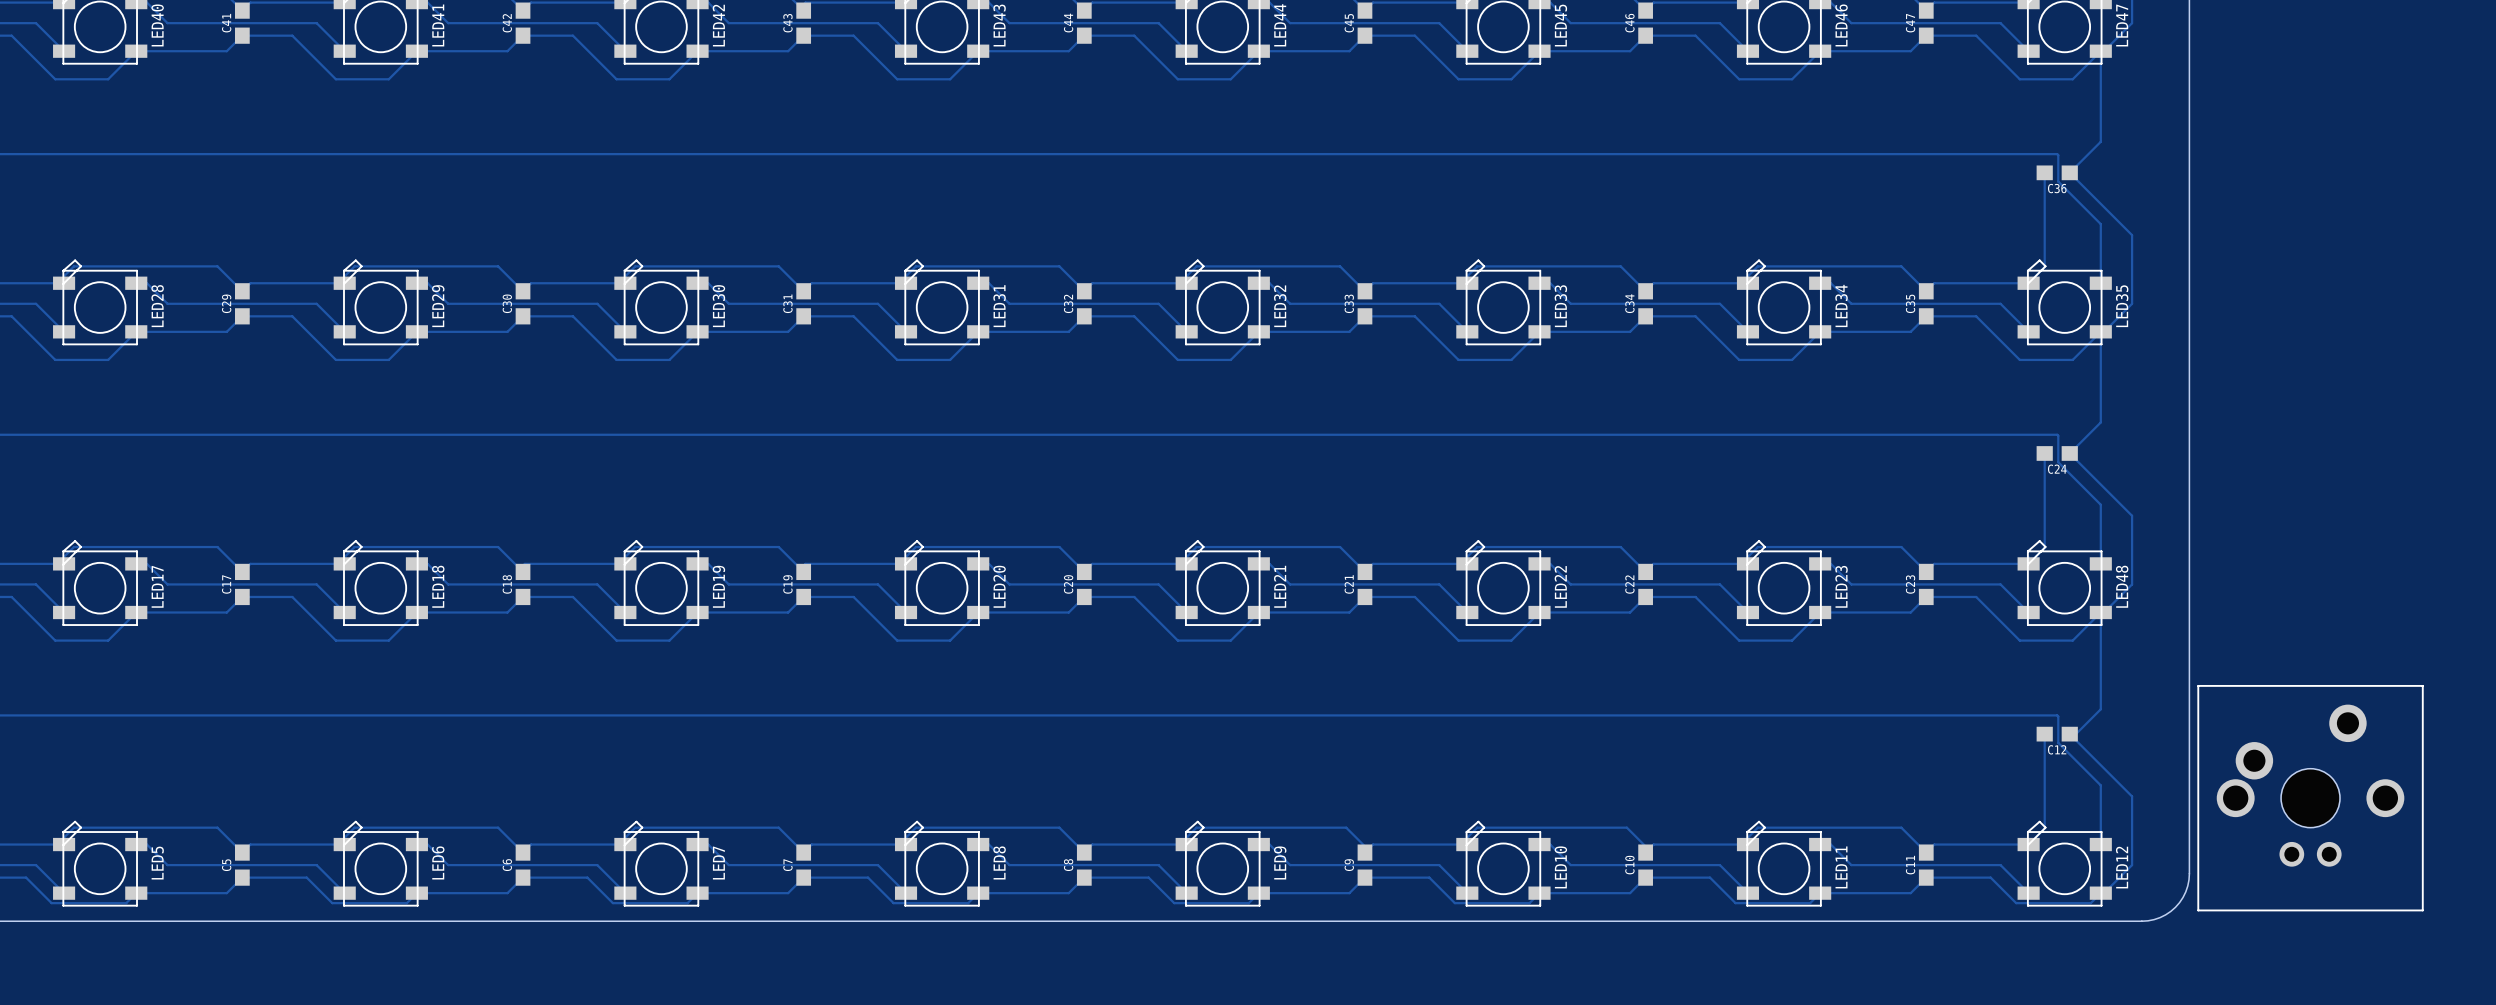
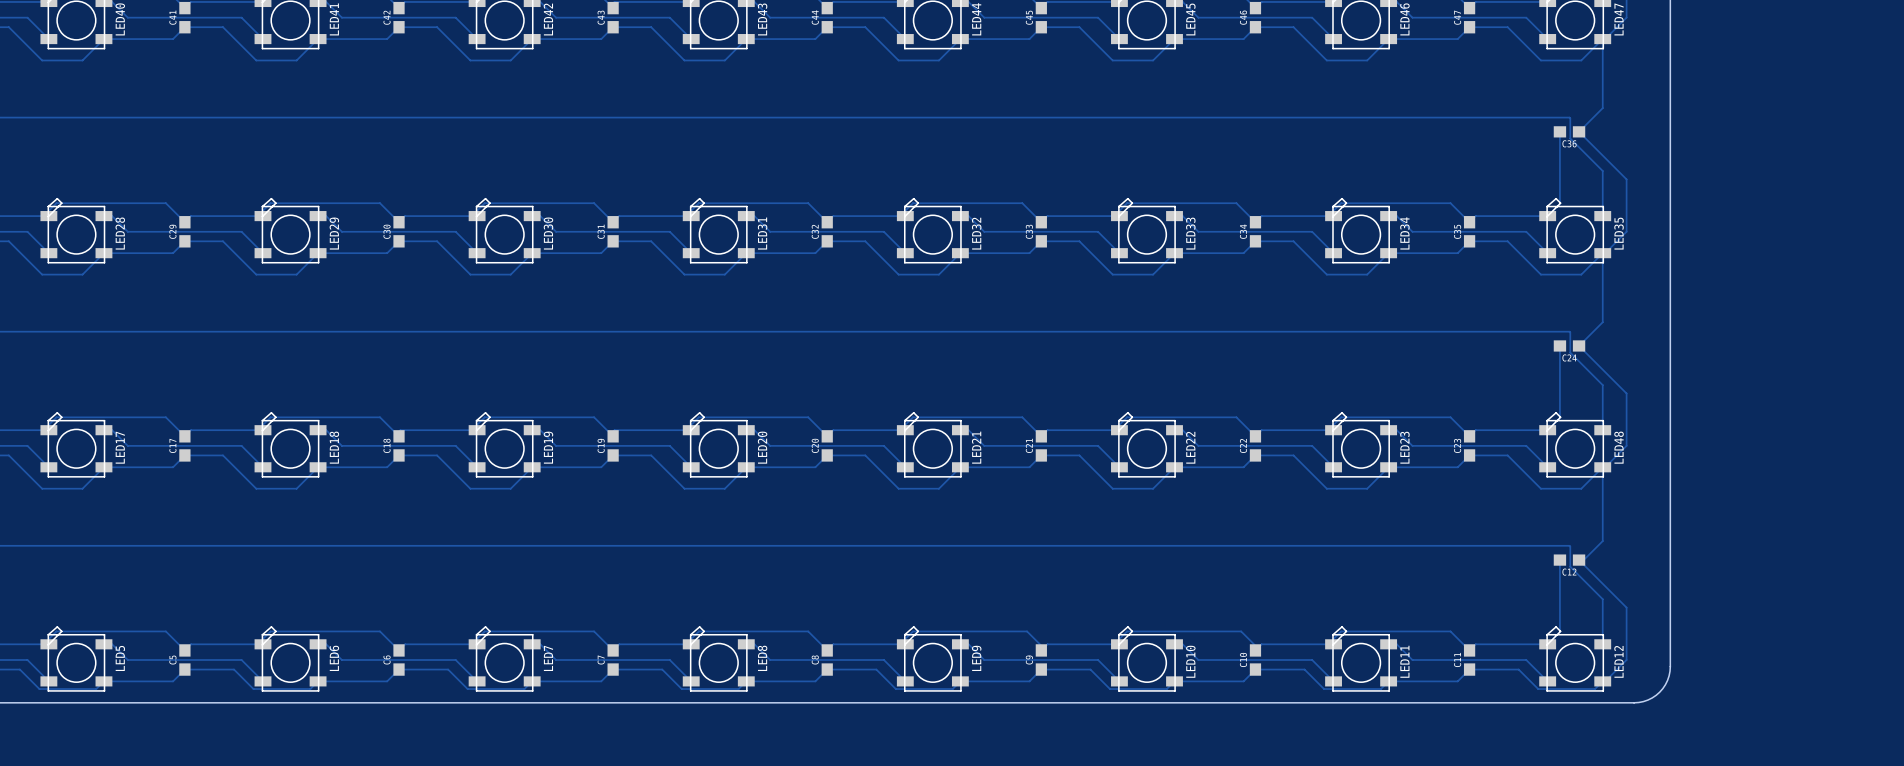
part: (2310, 798) -> none

